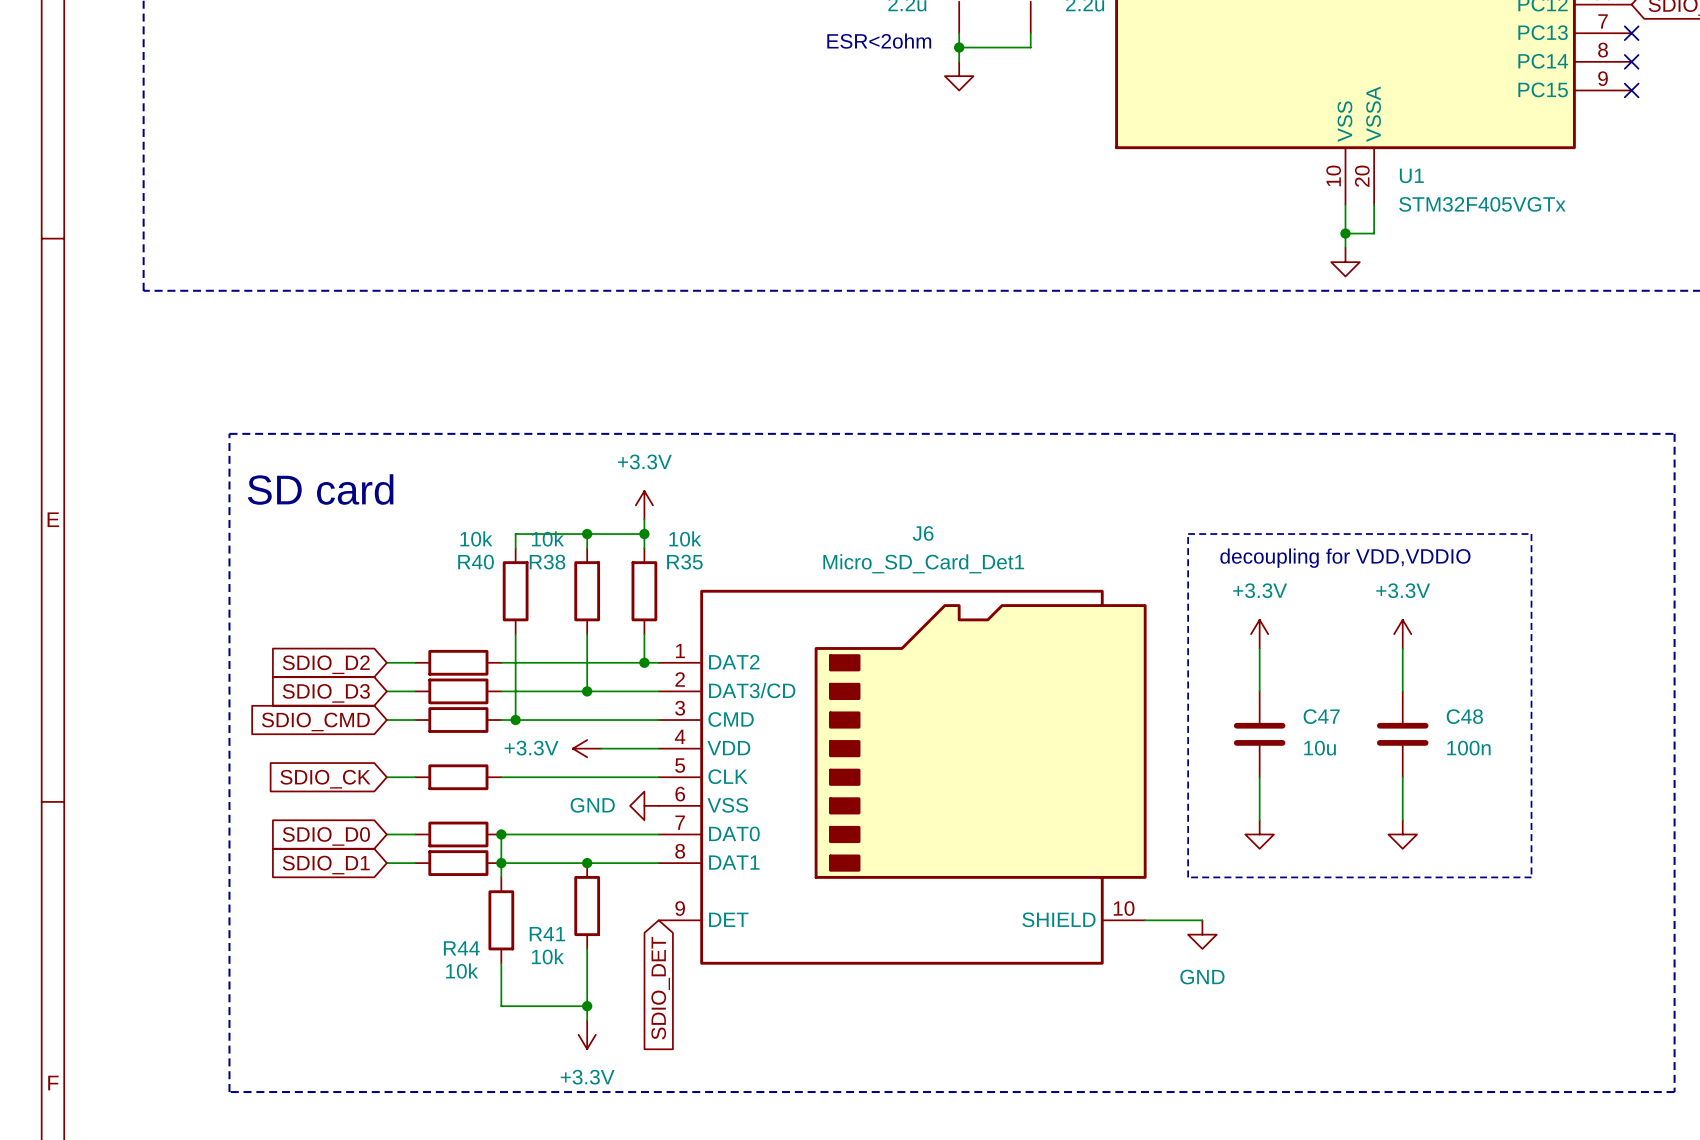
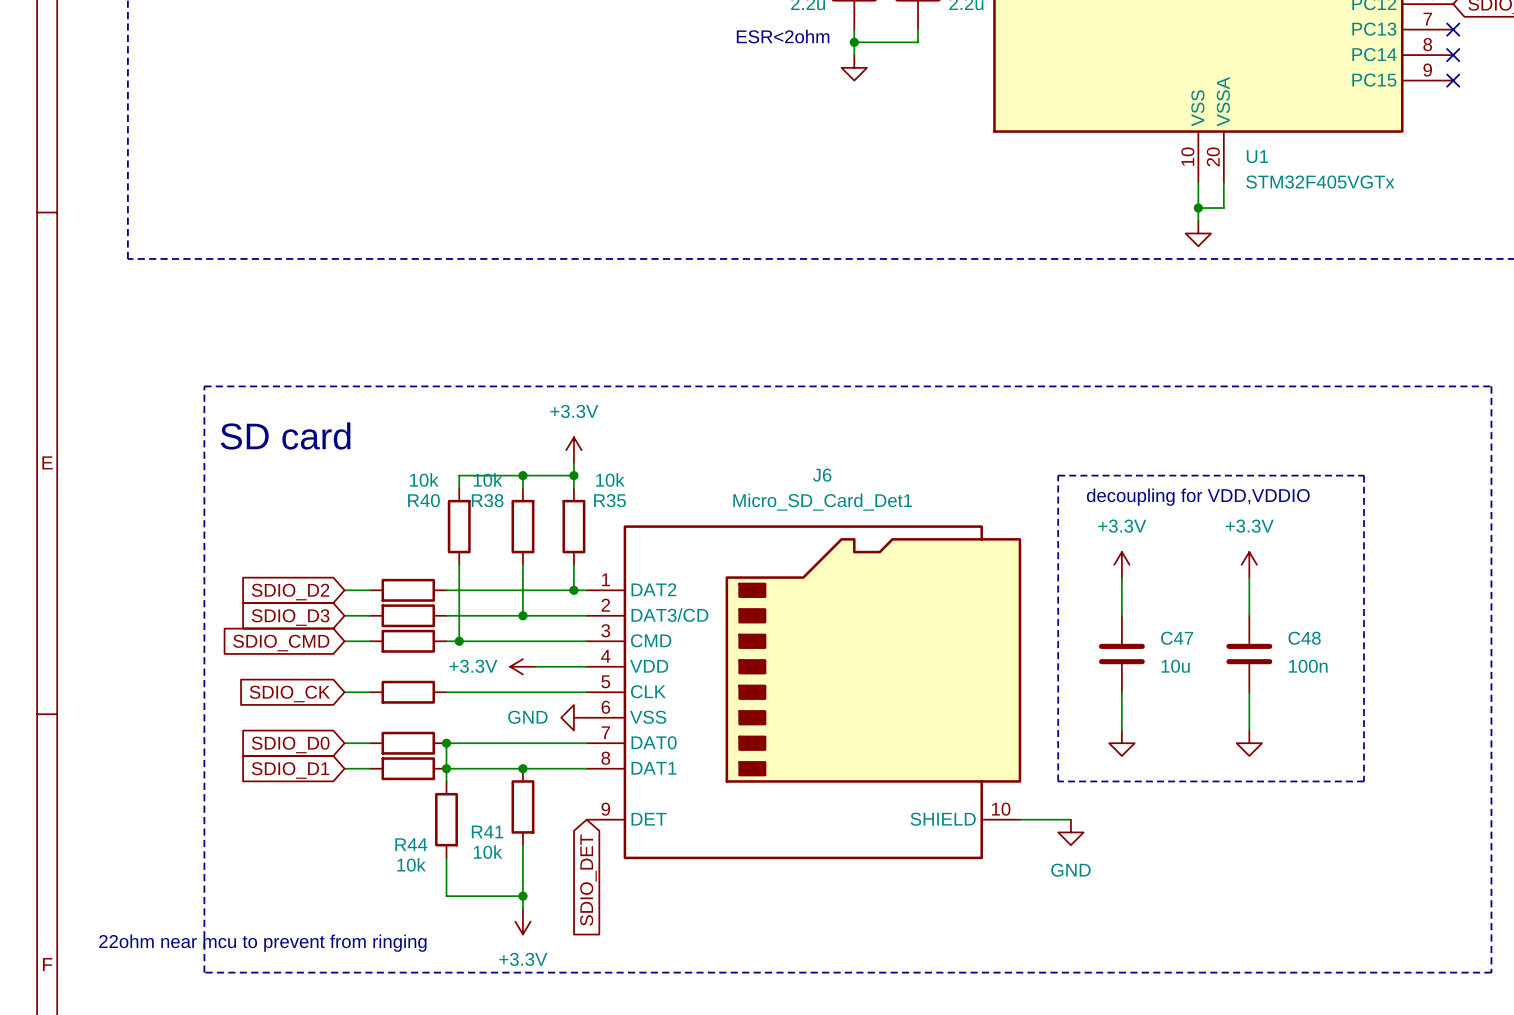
text: none -> 22ohm near mcu to prevent from ringing (262, 943)

